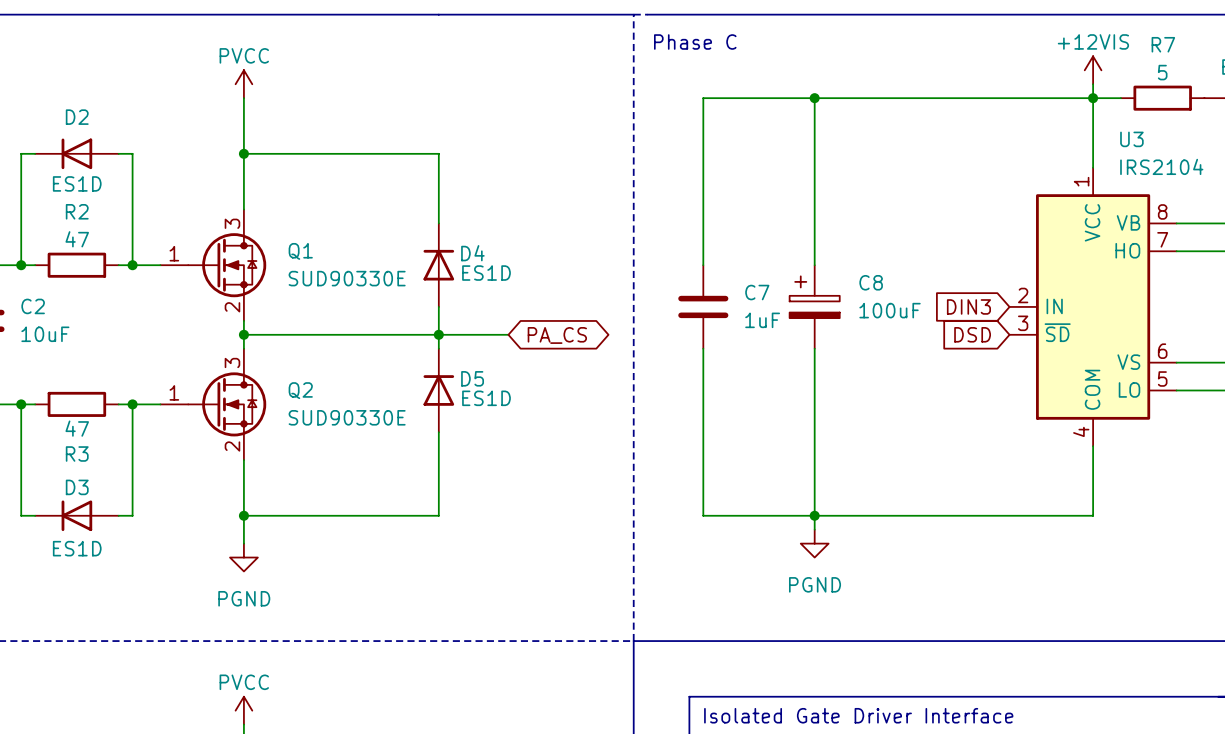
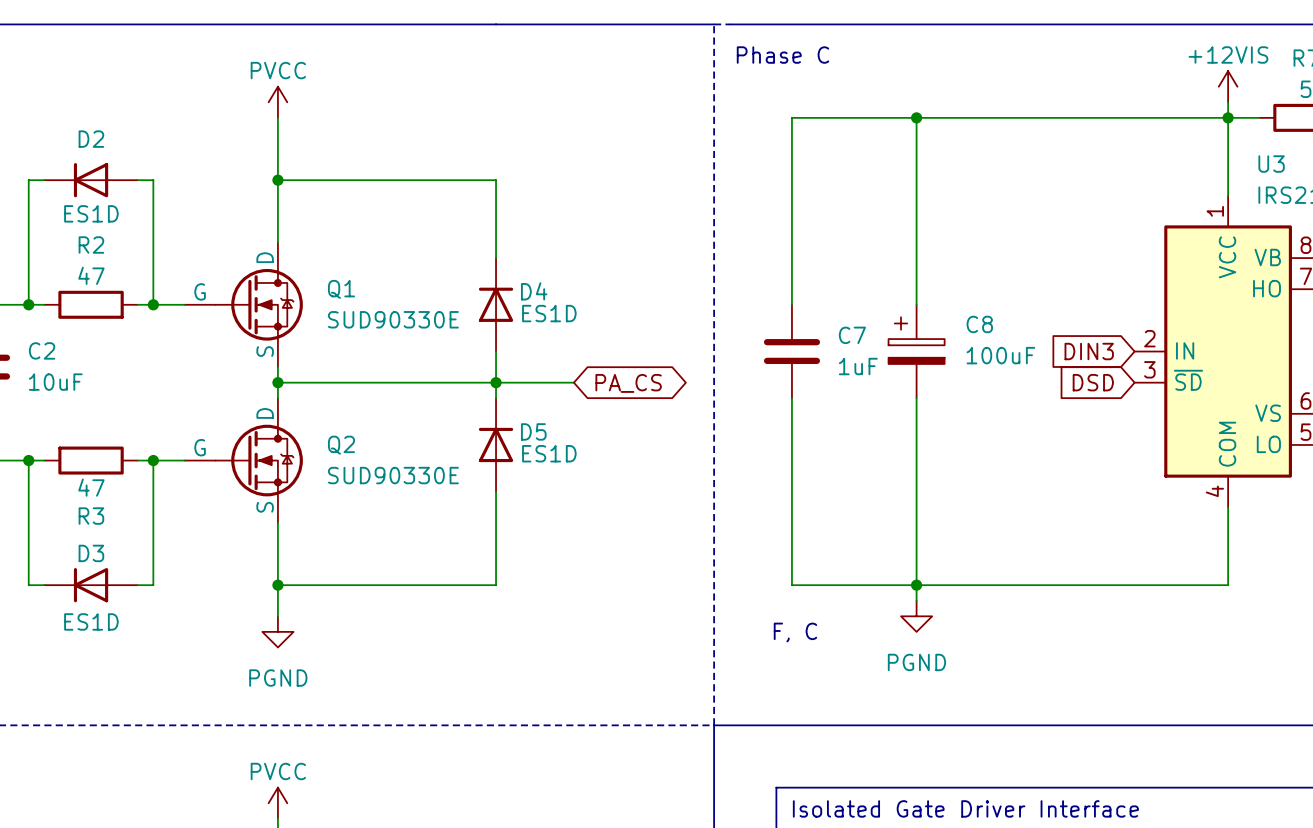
Q1 symbol: [160, 209, 267, 321] -> [184, 242, 303, 368]
Q2 symbol: [160, 348, 267, 461] -> [184, 398, 303, 523]
text: none -> F, C (795, 632)

